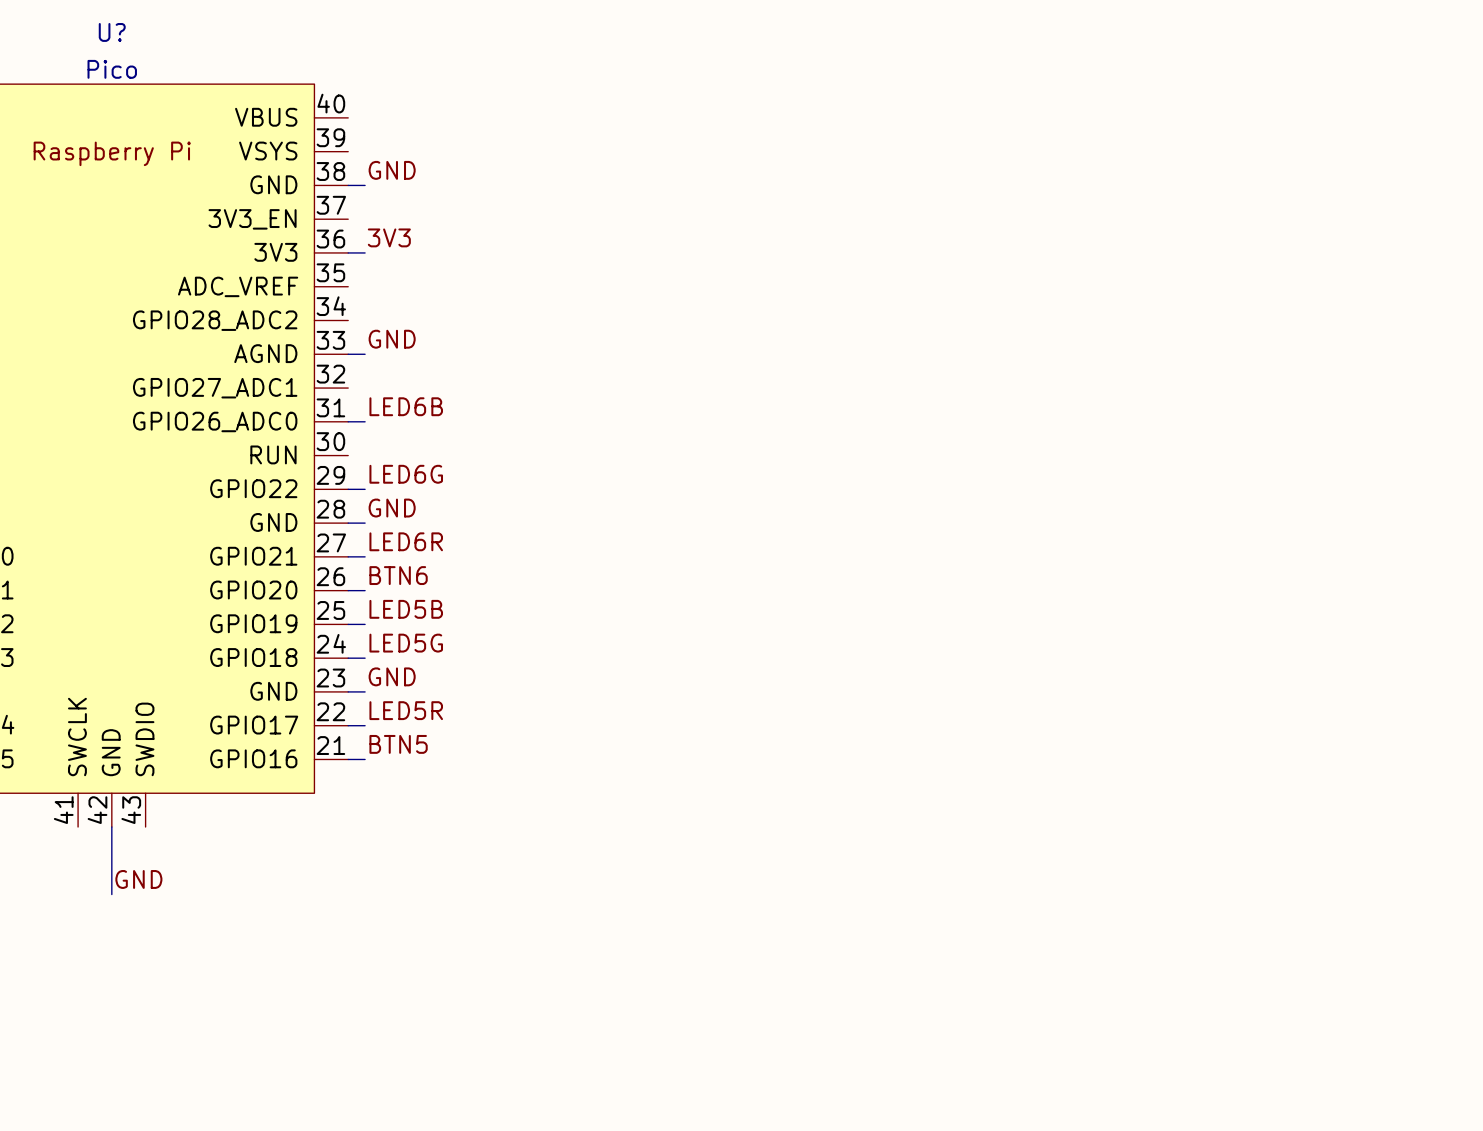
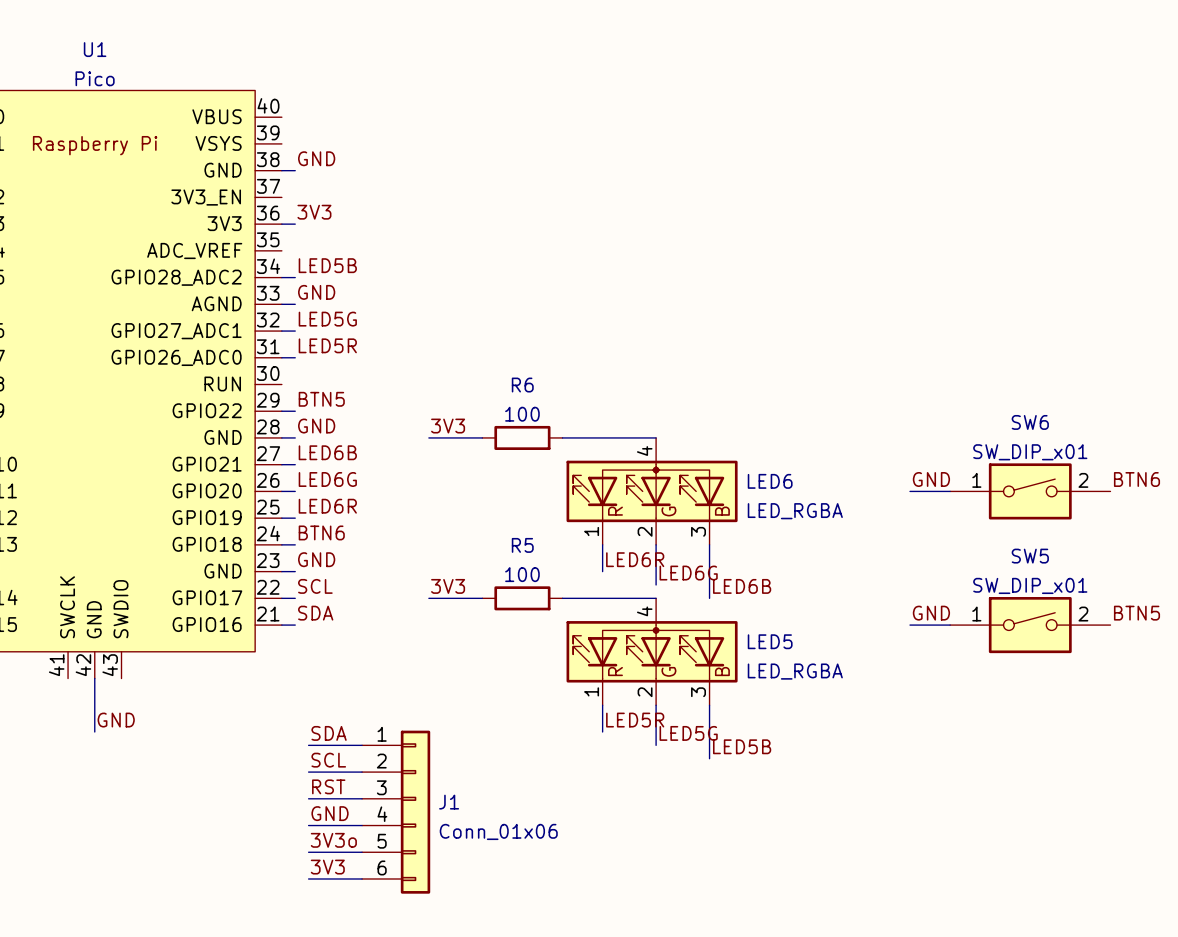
U? name: U? (112, 32) -> U1 (95, 49)
label: none -> LED5B (327, 265)
wire: none -> (281, 277) (295, 277)
label: none -> LED5G (327, 319)
wire: none -> (281, 331) (295, 331)
label: LED6B (406, 406) -> LED5R (327, 345)
label: LED6G (406, 474) -> BTN5 (321, 399)
label: none -> 3V3 (448, 426)
wire: none -> (428, 437) (482, 437)
R6: none -> 100 (522, 437)
wire: none -> (562, 437) (656, 437)
label: LED6R (406, 541) -> LED6B (327, 452)
label: BTN6 (398, 575) -> LED6G (327, 479)
label: none -> GND (931, 479)
label: none -> BTN6 (1136, 479)
LED6: none -> LED_RGBA (652, 491)
wire: none -> (910, 491) (950, 491)
SW6: none -> SW_DIP_x01 (1030, 491)
label: LED5B (406, 609) -> LED6R (327, 506)
label: LED5G (406, 643) -> BTN6 (321, 532)
wire: none -> (602, 544) (602, 571)
wire: none -> (656, 544) (656, 584)
wire: none -> (709, 544) (709, 598)
label: none -> LED6R (635, 559)
label: none -> LED6G (688, 573)
label: LED5R (406, 710) -> SCL (315, 586)
label: none -> 3V3 (448, 586)
label: none -> LED6B (742, 586)
wire: none -> (428, 598) (482, 598)
R5: none -> 100 (522, 598)
wire: none -> (562, 598) (656, 598)
label: BTN5 (398, 744) -> SDA (315, 613)
label: none -> GND (931, 613)
label: none -> BTN5 (1136, 613)
wire: none -> (910, 625) (950, 625)
SW5: none -> SW_DIP_x01 (1030, 625)
LED5: none -> LED_RGBA (652, 651)
wire: none -> (602, 705) (602, 731)
wire: none -> (656, 705) (656, 745)
wire: none -> (709, 705) (709, 758)
label: none -> LED5R (635, 720)
label: none -> SDA (329, 733)
label: none -> LED5G (688, 733)
wire: none -> (308, 745) (362, 745)
label: none -> LED5B (742, 746)
label: none -> SCL (328, 760)
wire: none -> (308, 772) (362, 772)
label: none -> RST (328, 786)
wire: none -> (308, 798) (362, 798)
J1: none -> Conn_01x06 (396, 812)
label: none -> GND (330, 813)
wire: none -> (308, 825) (362, 825)
label: none -> 3V3o (333, 840)
wire: none -> (308, 852) (362, 852)
label: none -> 3V3 (327, 867)
wire: none -> (308, 878) (362, 878)

